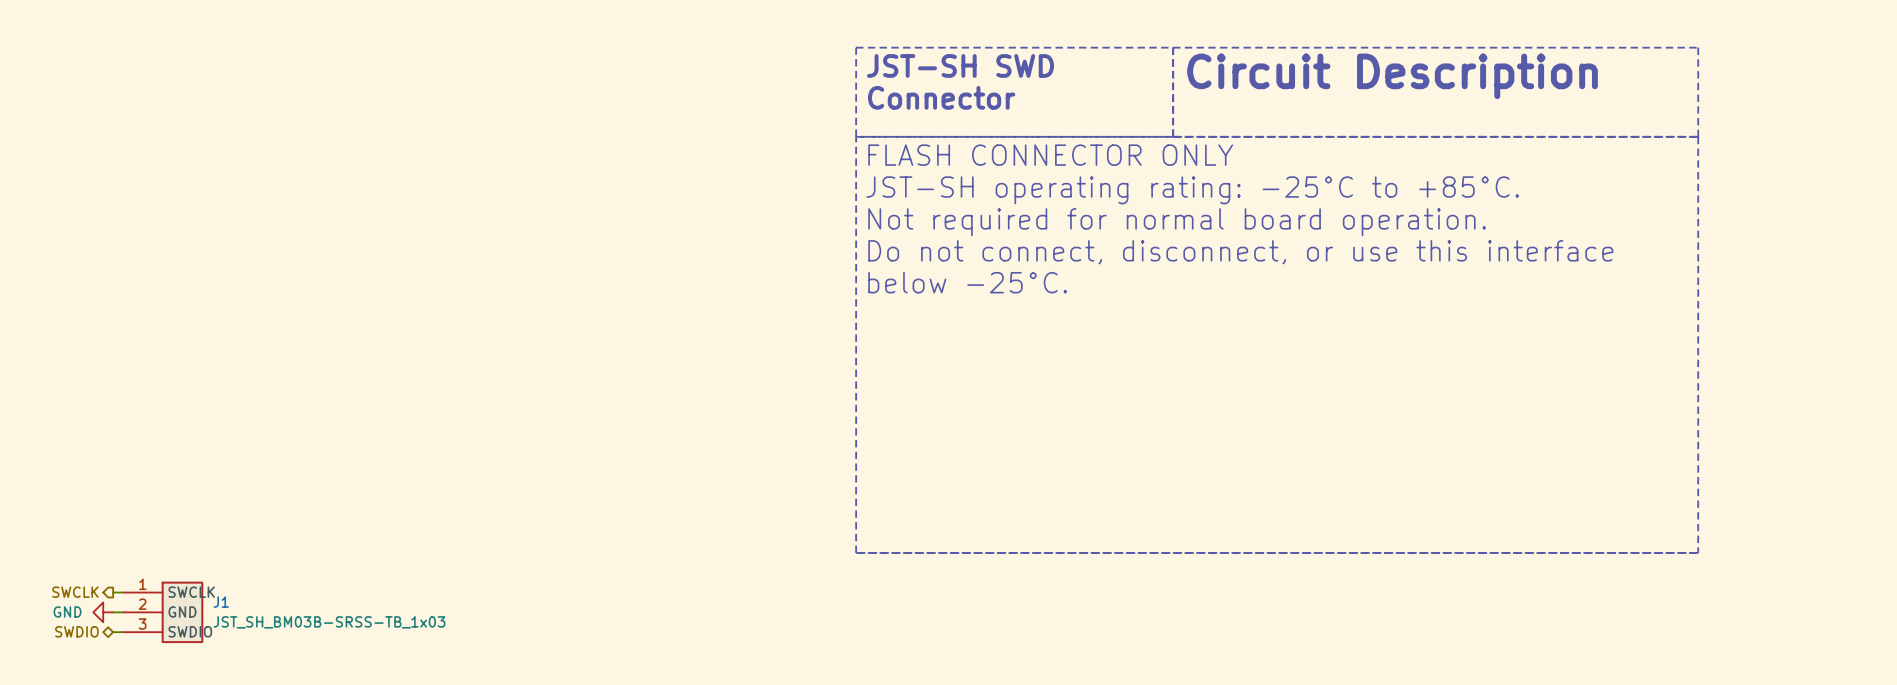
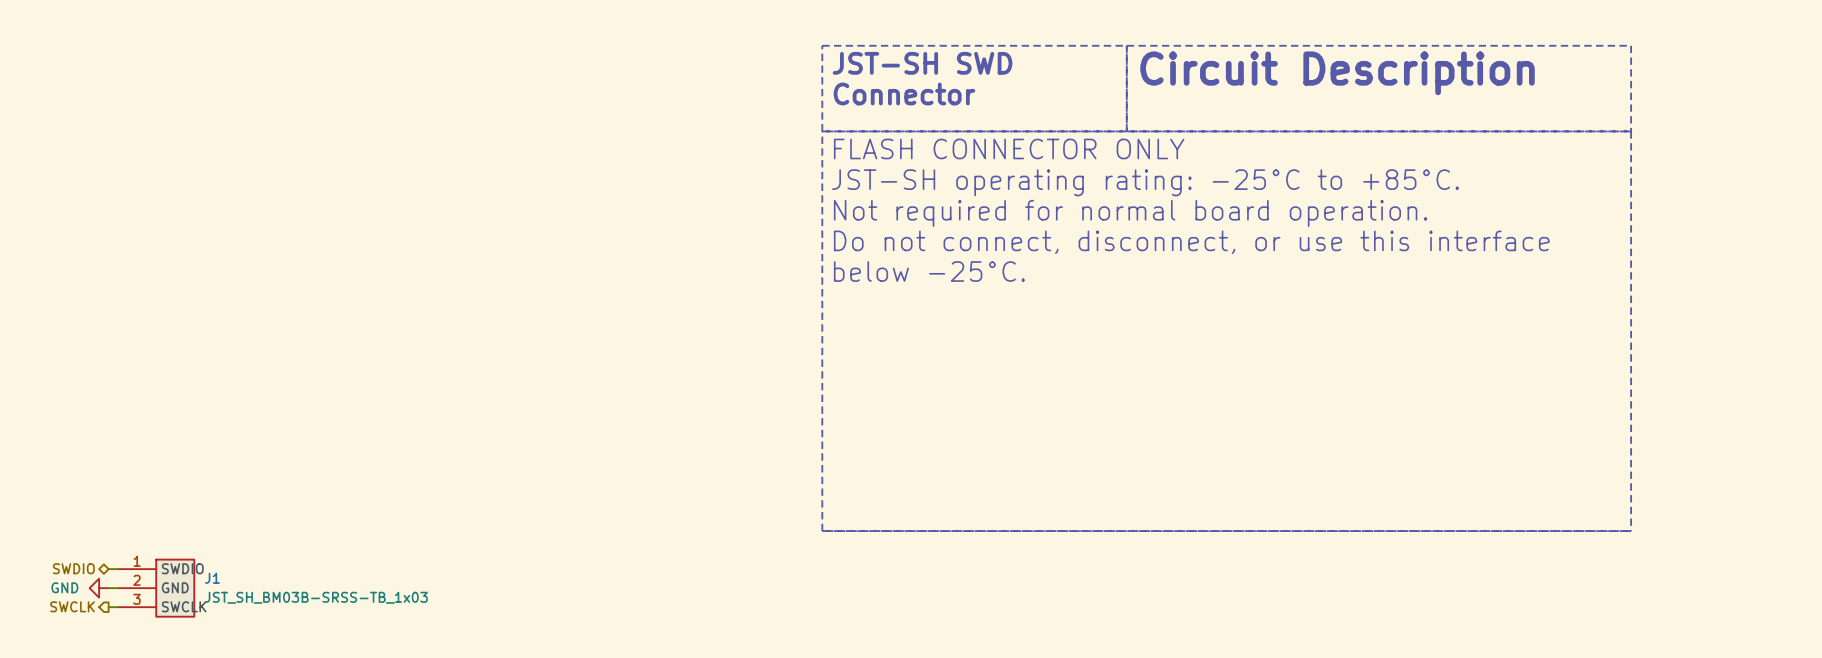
hierarchical label shape: output (75, 592) -> bidirectional (73, 568)
hierarchical label: SWCLK (75, 592) -> SWDIO (73, 568)
J1 pin name: SWCLK (191, 592) -> SWDIO (182, 568)
hierarchical label shape: bidirectional (76, 631) -> output (72, 606)
hierarchical label: SWDIO (76, 631) -> SWCLK (72, 606)
J1 pin name: SWDIO (190, 631) -> SWCLK (184, 606)

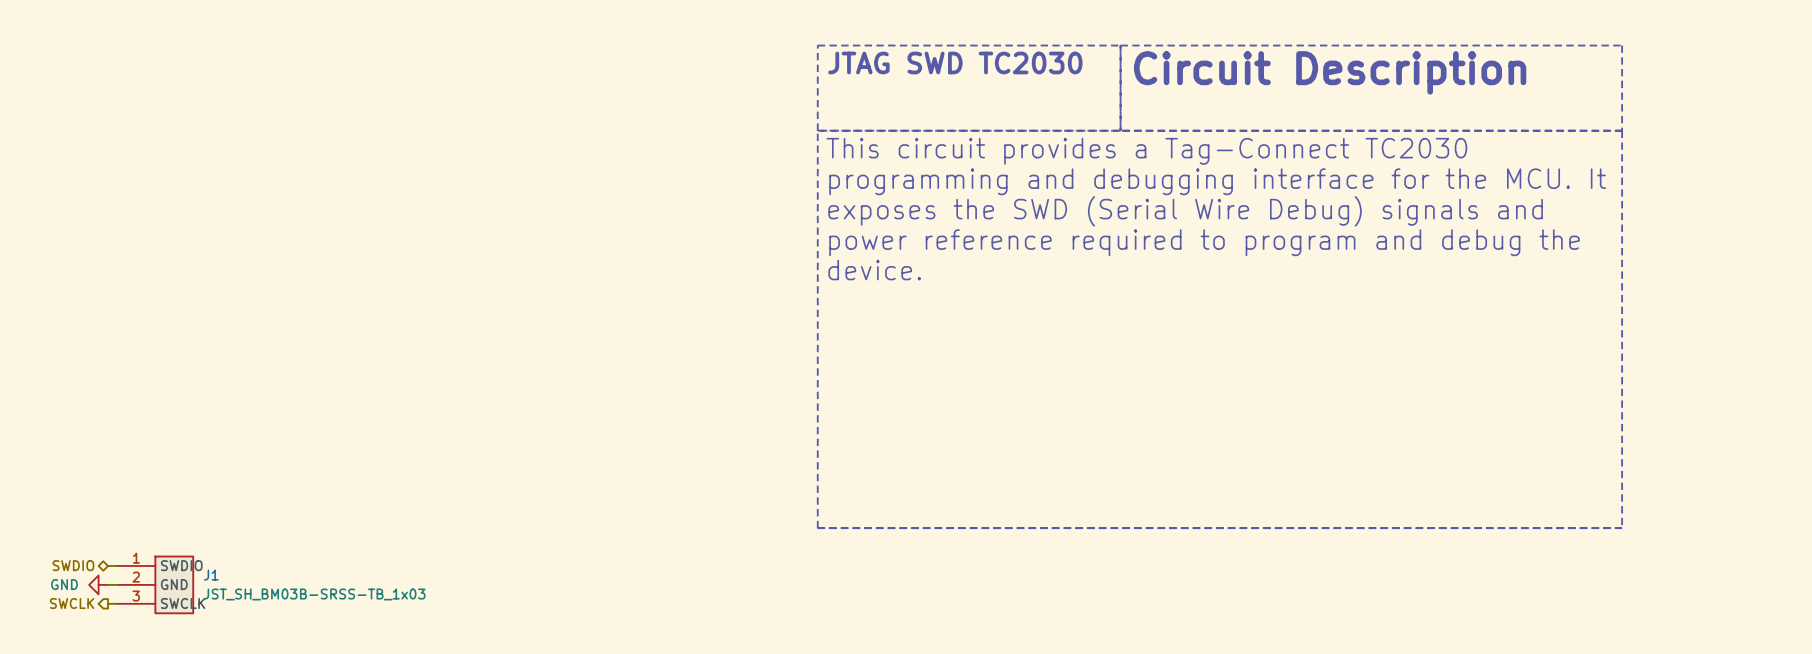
text: JST-SH SWD (922, 63) -> JTAG SWD TC2030 (955, 62)
text: Connector (904, 93) -> none
text: FLASH CONNECTOR ONLY (1009, 148) -> This circuit provides a Tag-Connect TC2030 (1146, 151)
text: JST-SH operating rating: -25°C to +85°C. (1145, 182) -> programming and debugging interface for the MCU. It (1217, 181)
text: Not required for normal board operation. (1130, 213) -> exposes the SWD (Serial Wire Debug) signals and (1185, 211)
text: Do not connect, disconnect, or use this interface (1191, 242) -> power reference required to program and debug the (1204, 242)
text: below -25°C. (929, 271) -> device. (874, 270)

